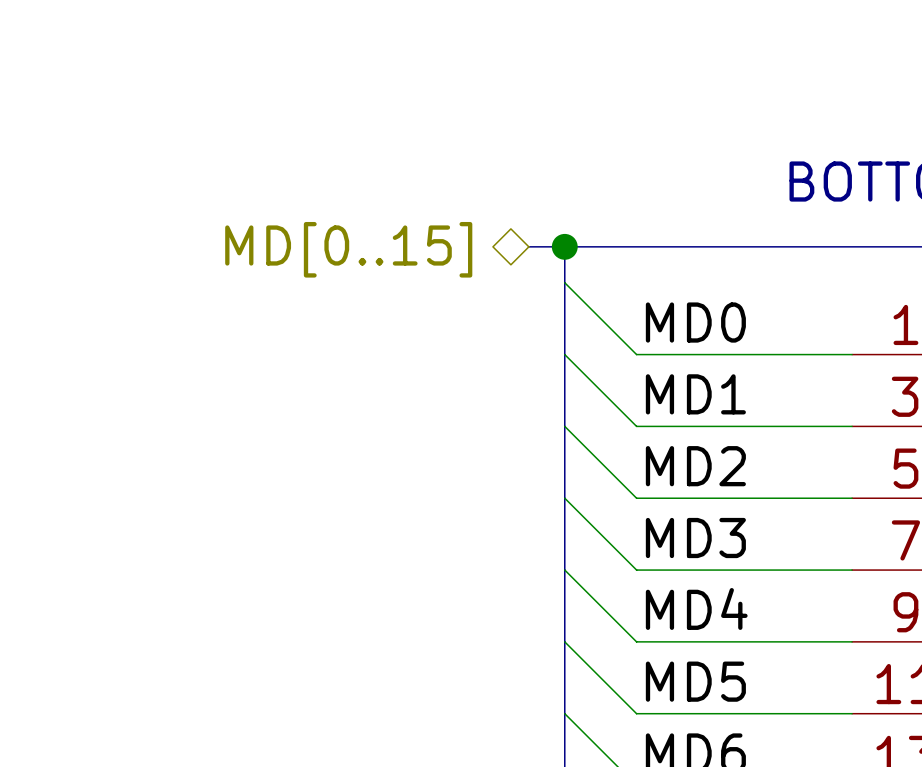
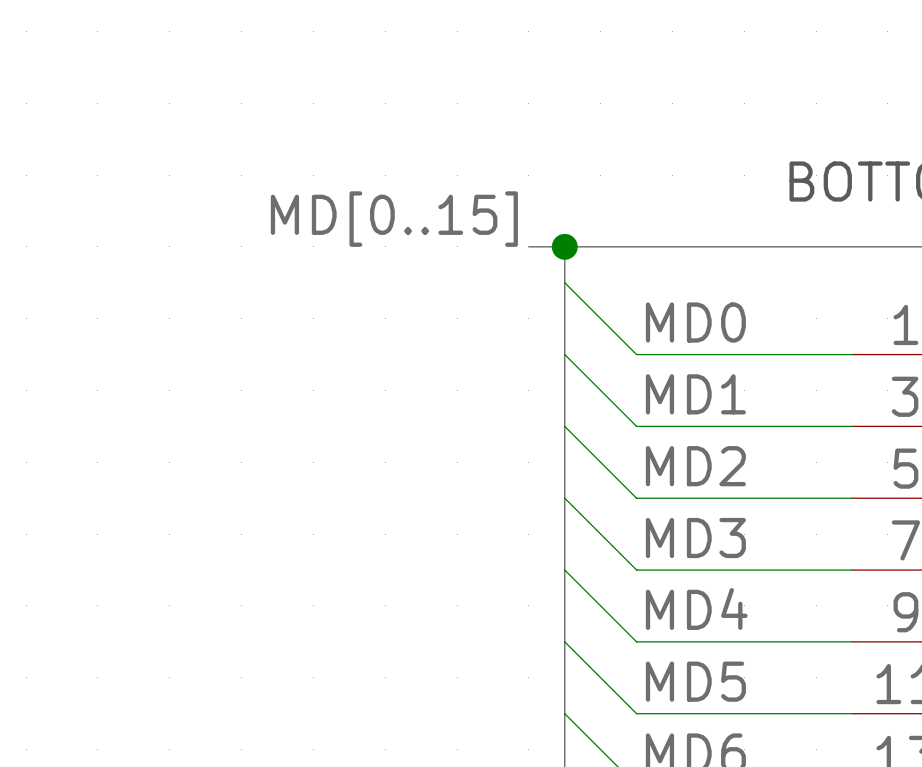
label: none -> MD[0..15] (394, 219)
hierarchical label: MD[0..15] (348, 249) -> none

